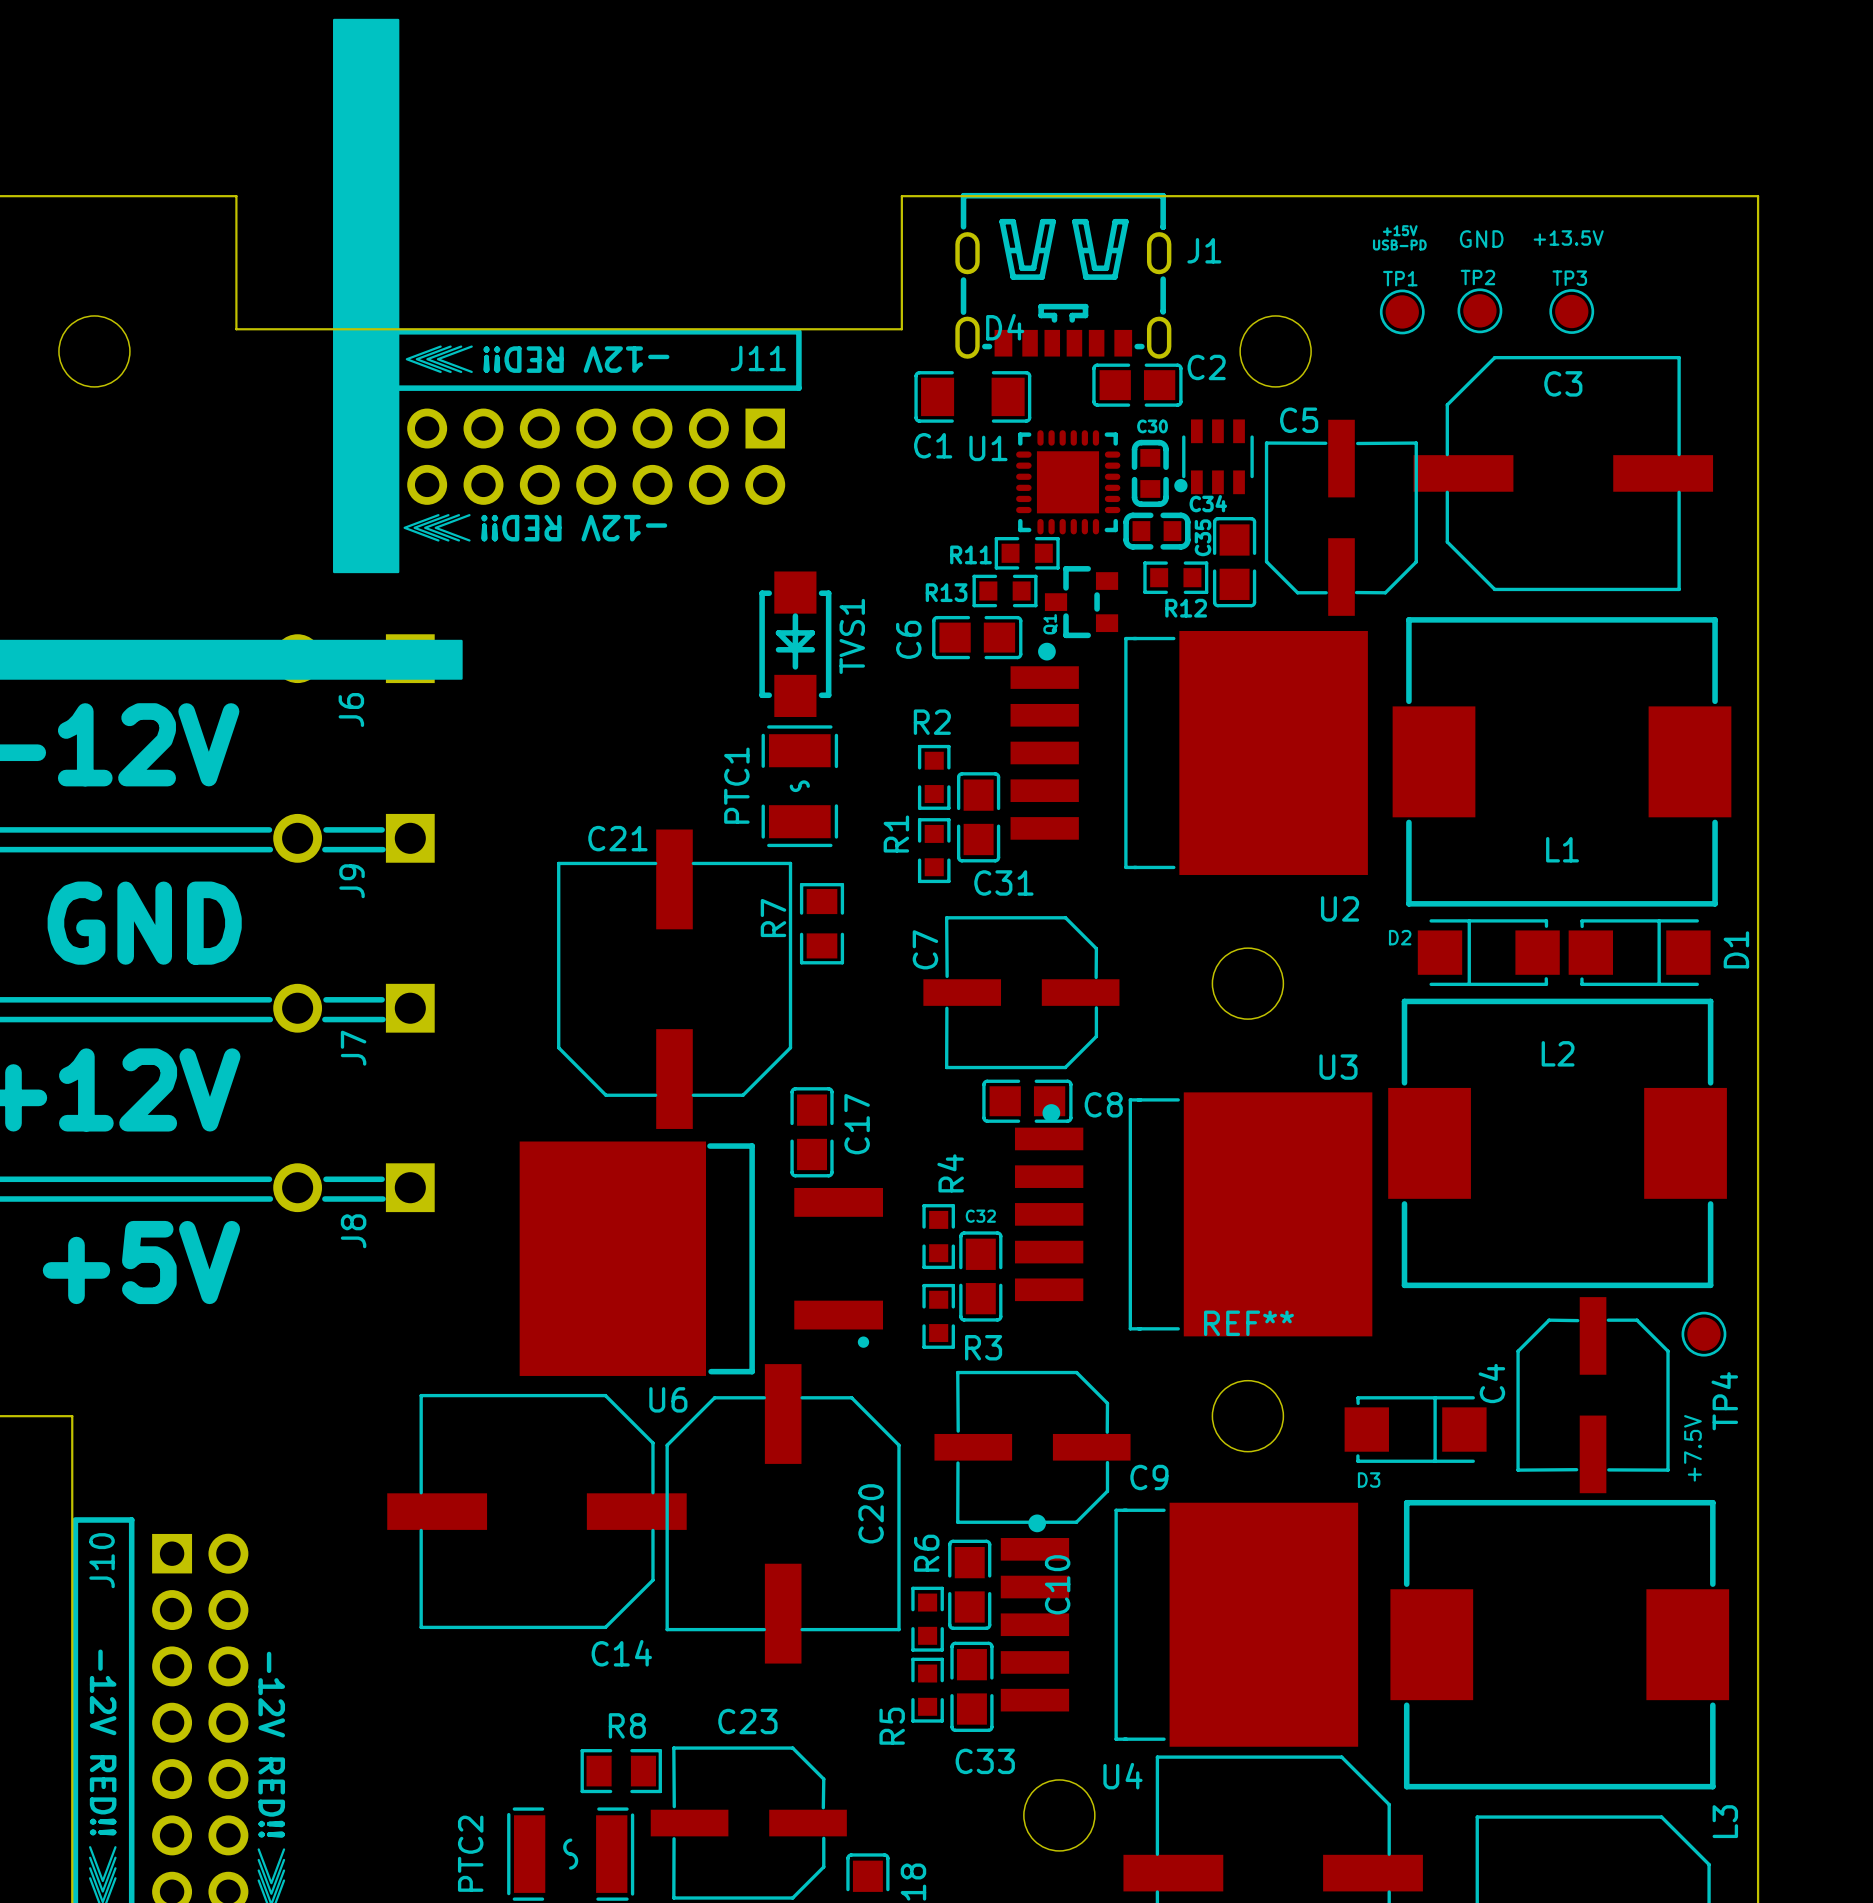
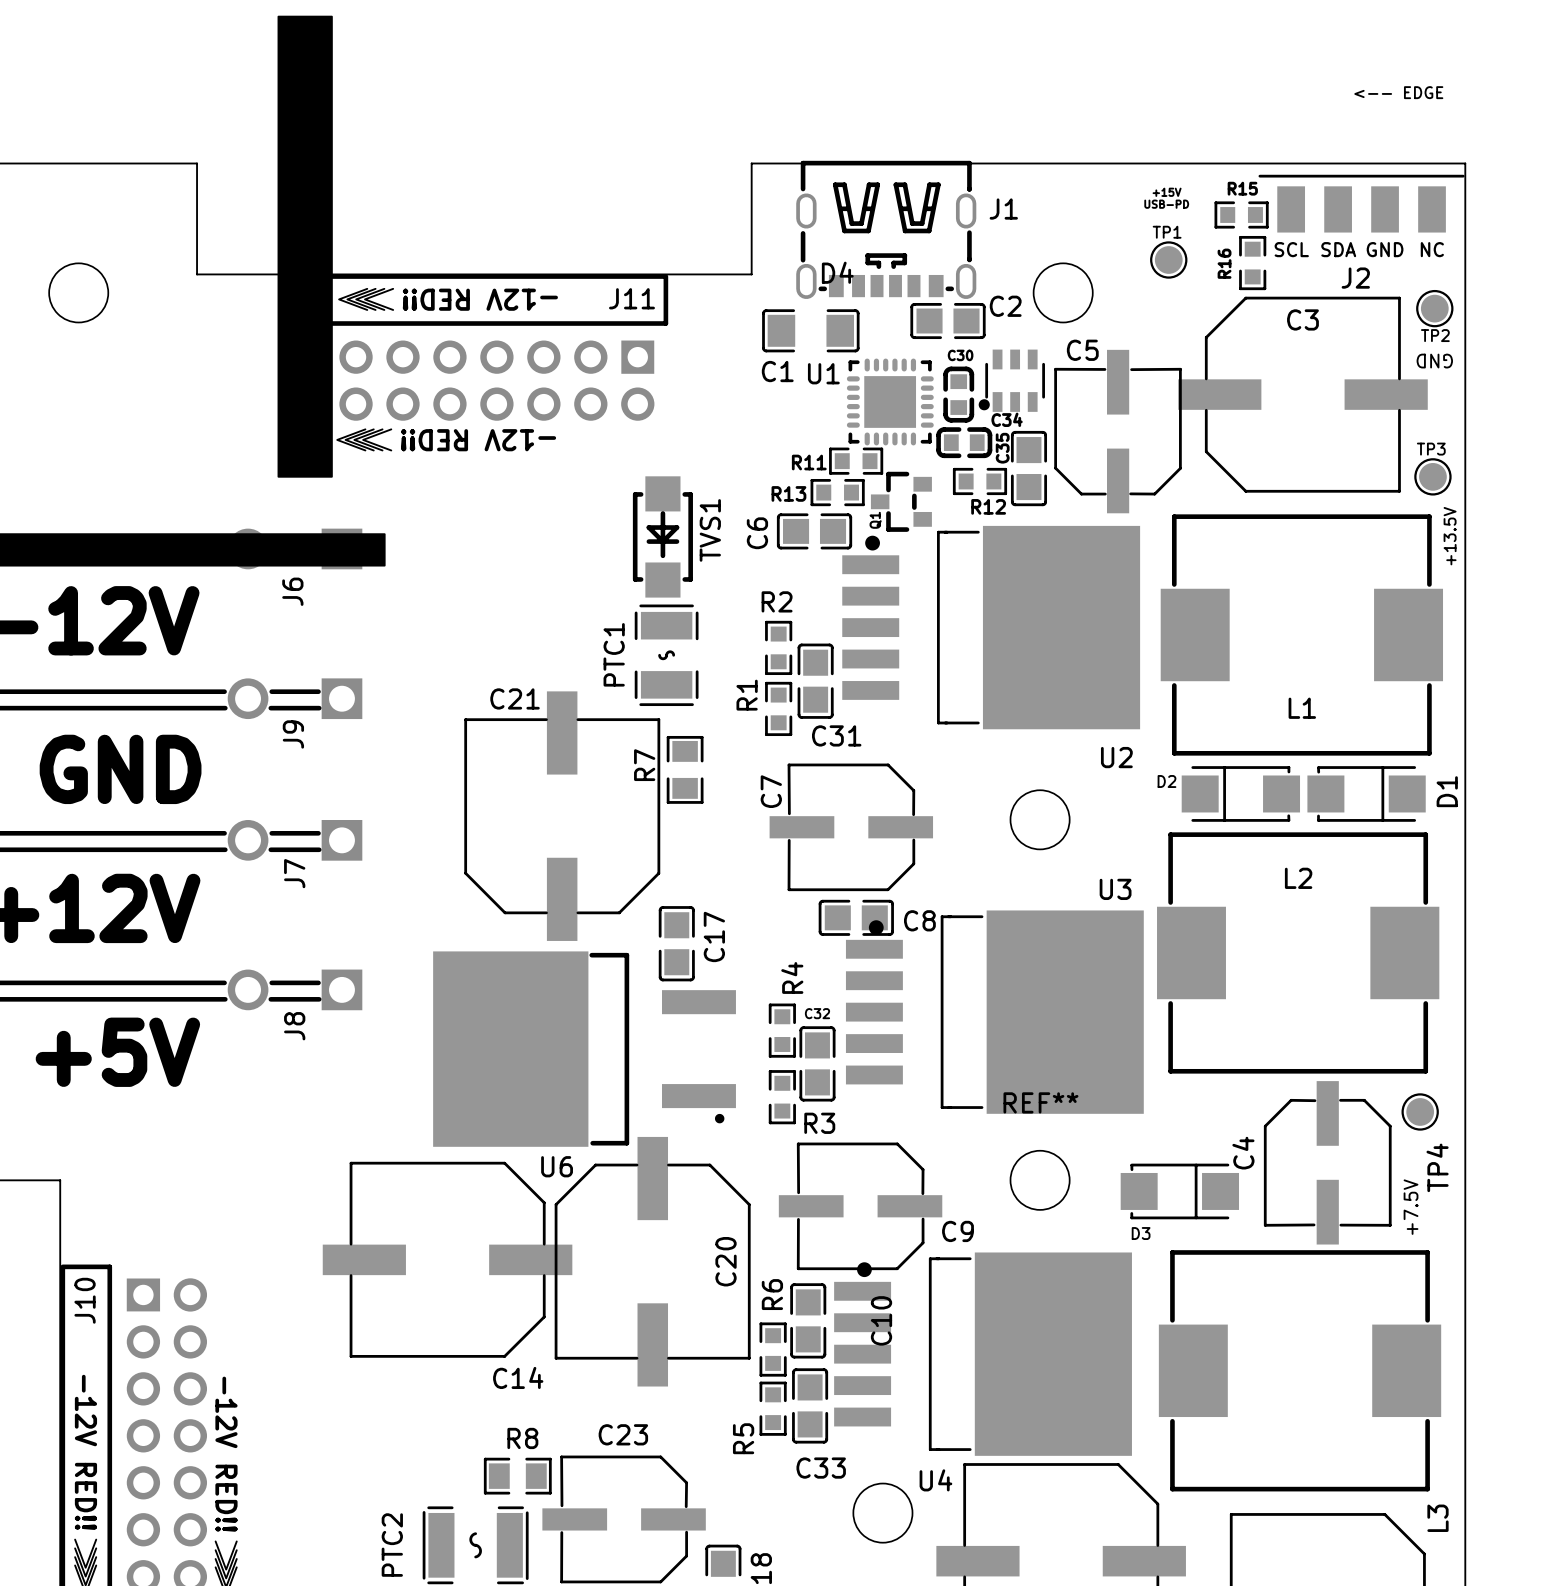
text rotation: 0° (1568, 238) -> 90° counterclockwise (1450, 536)
text position: +13.5V (1568, 238) -> +13.5V (1450, 536)
text rotation: 0° (1481, 239) -> 180° (1434, 361)
text position: GND (1481, 239) -> GND (1434, 361)
J2: none -> (1361, 203)
R15: none -> (1241, 214)
TP2 name position: TP2 (1477, 277) -> TP2 (1435, 335)
TP2 position: (1479, 310) -> (1434, 308)
TP3 position: (1571, 311) -> (1432, 476)
R16: none -> (1252, 263)

